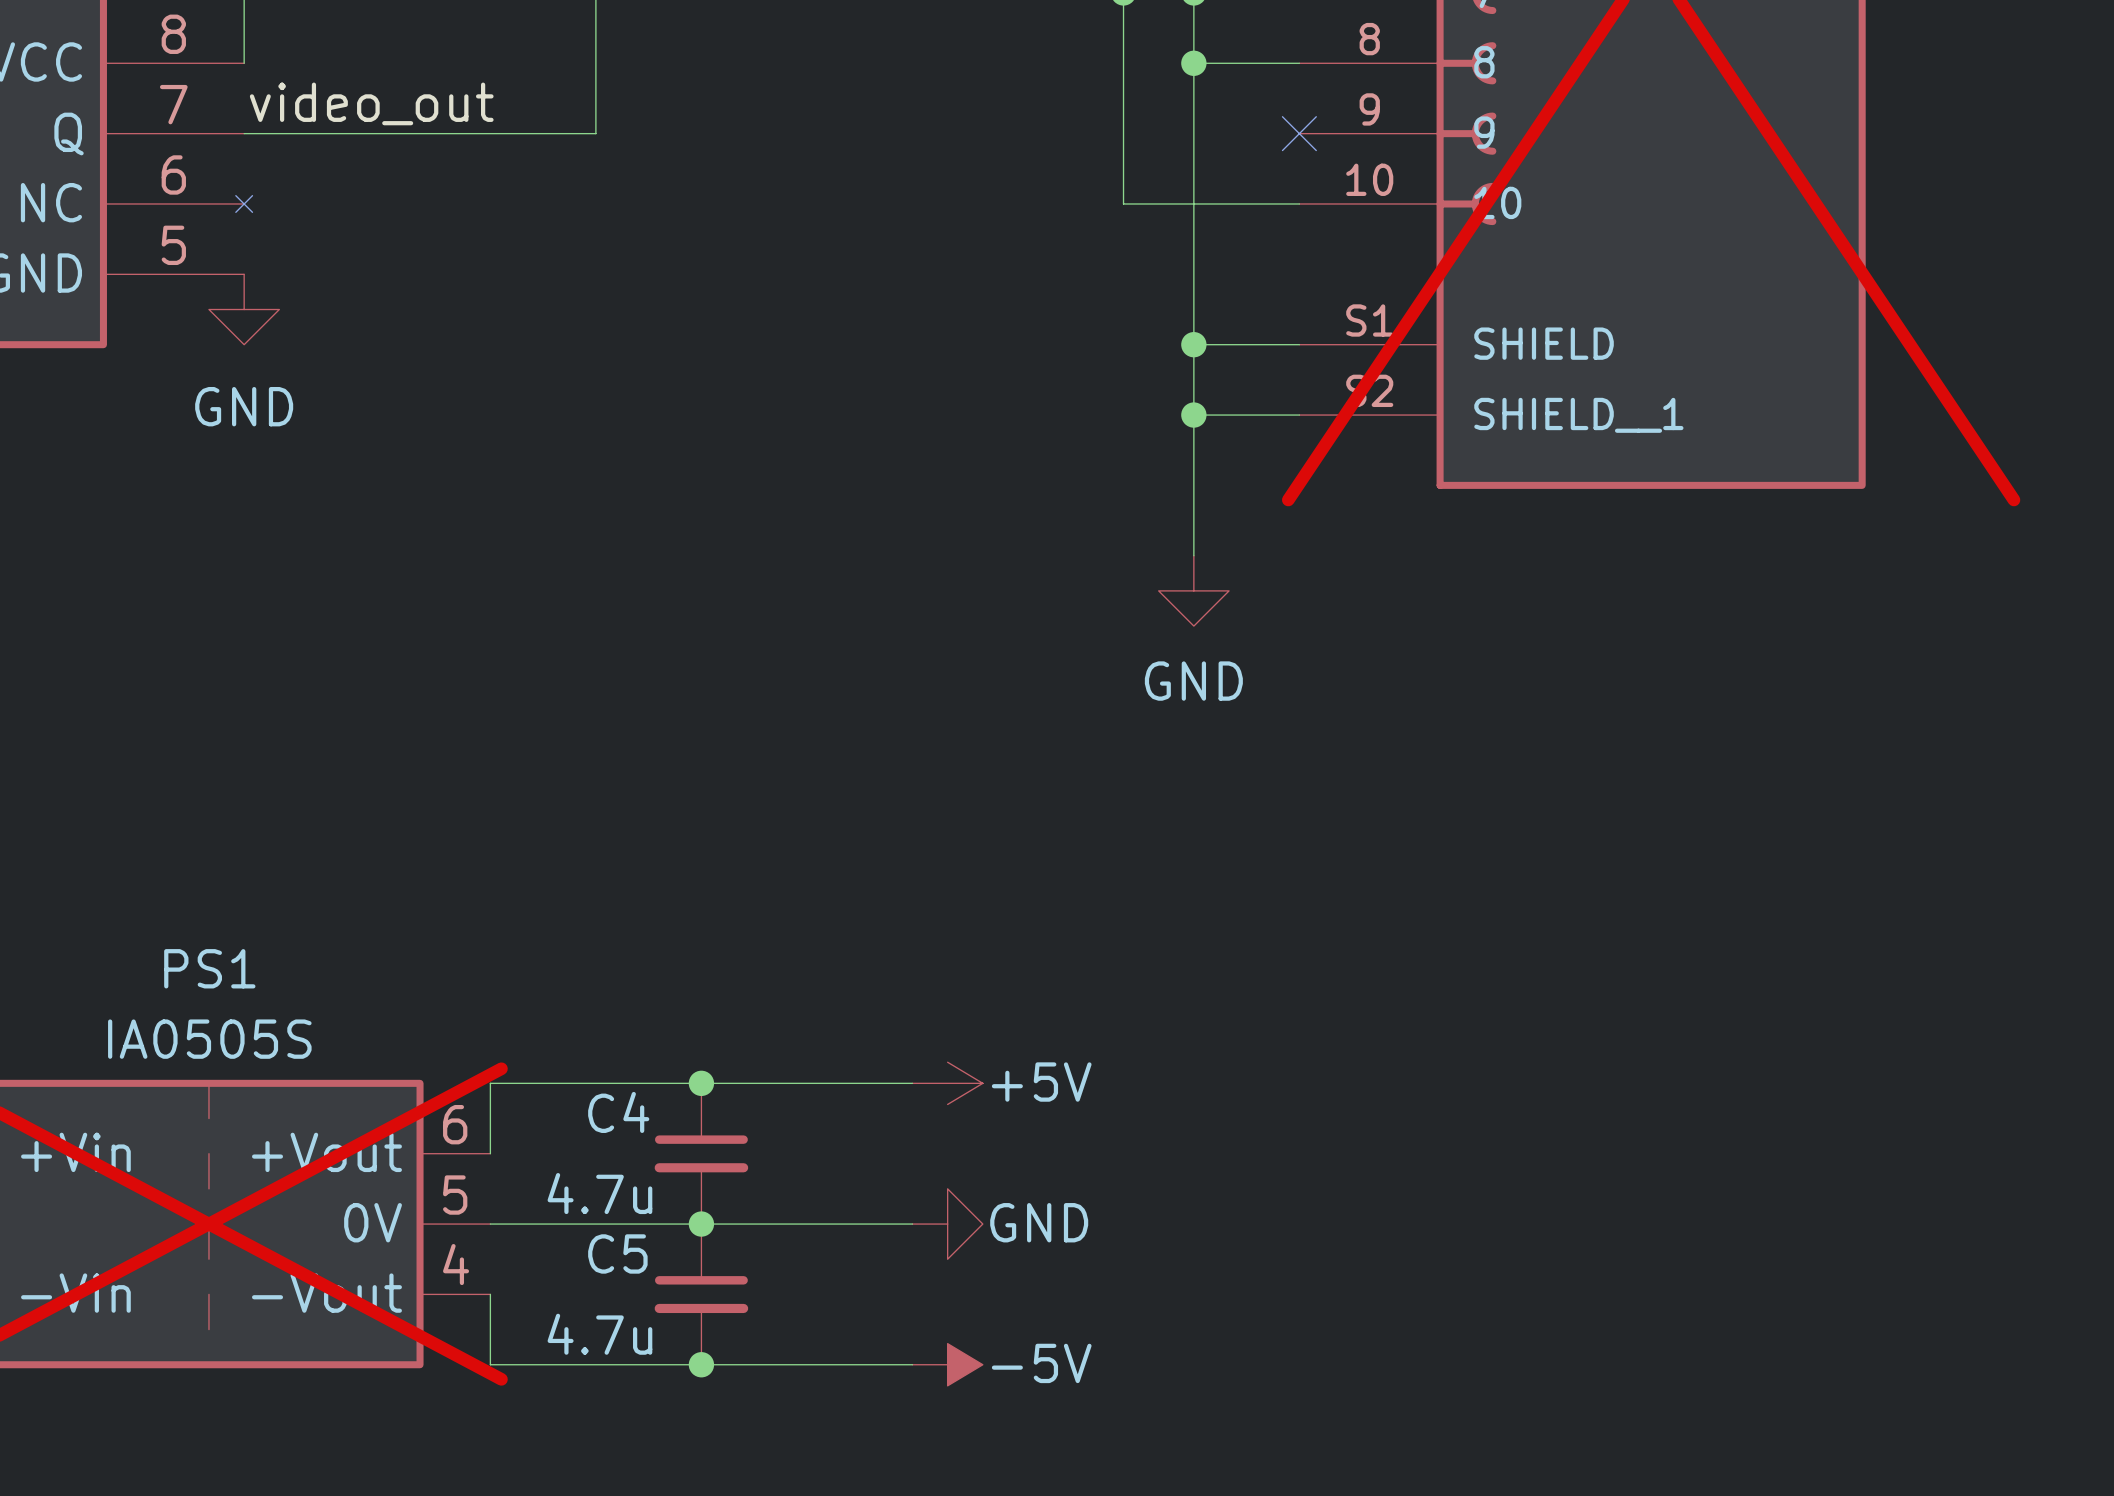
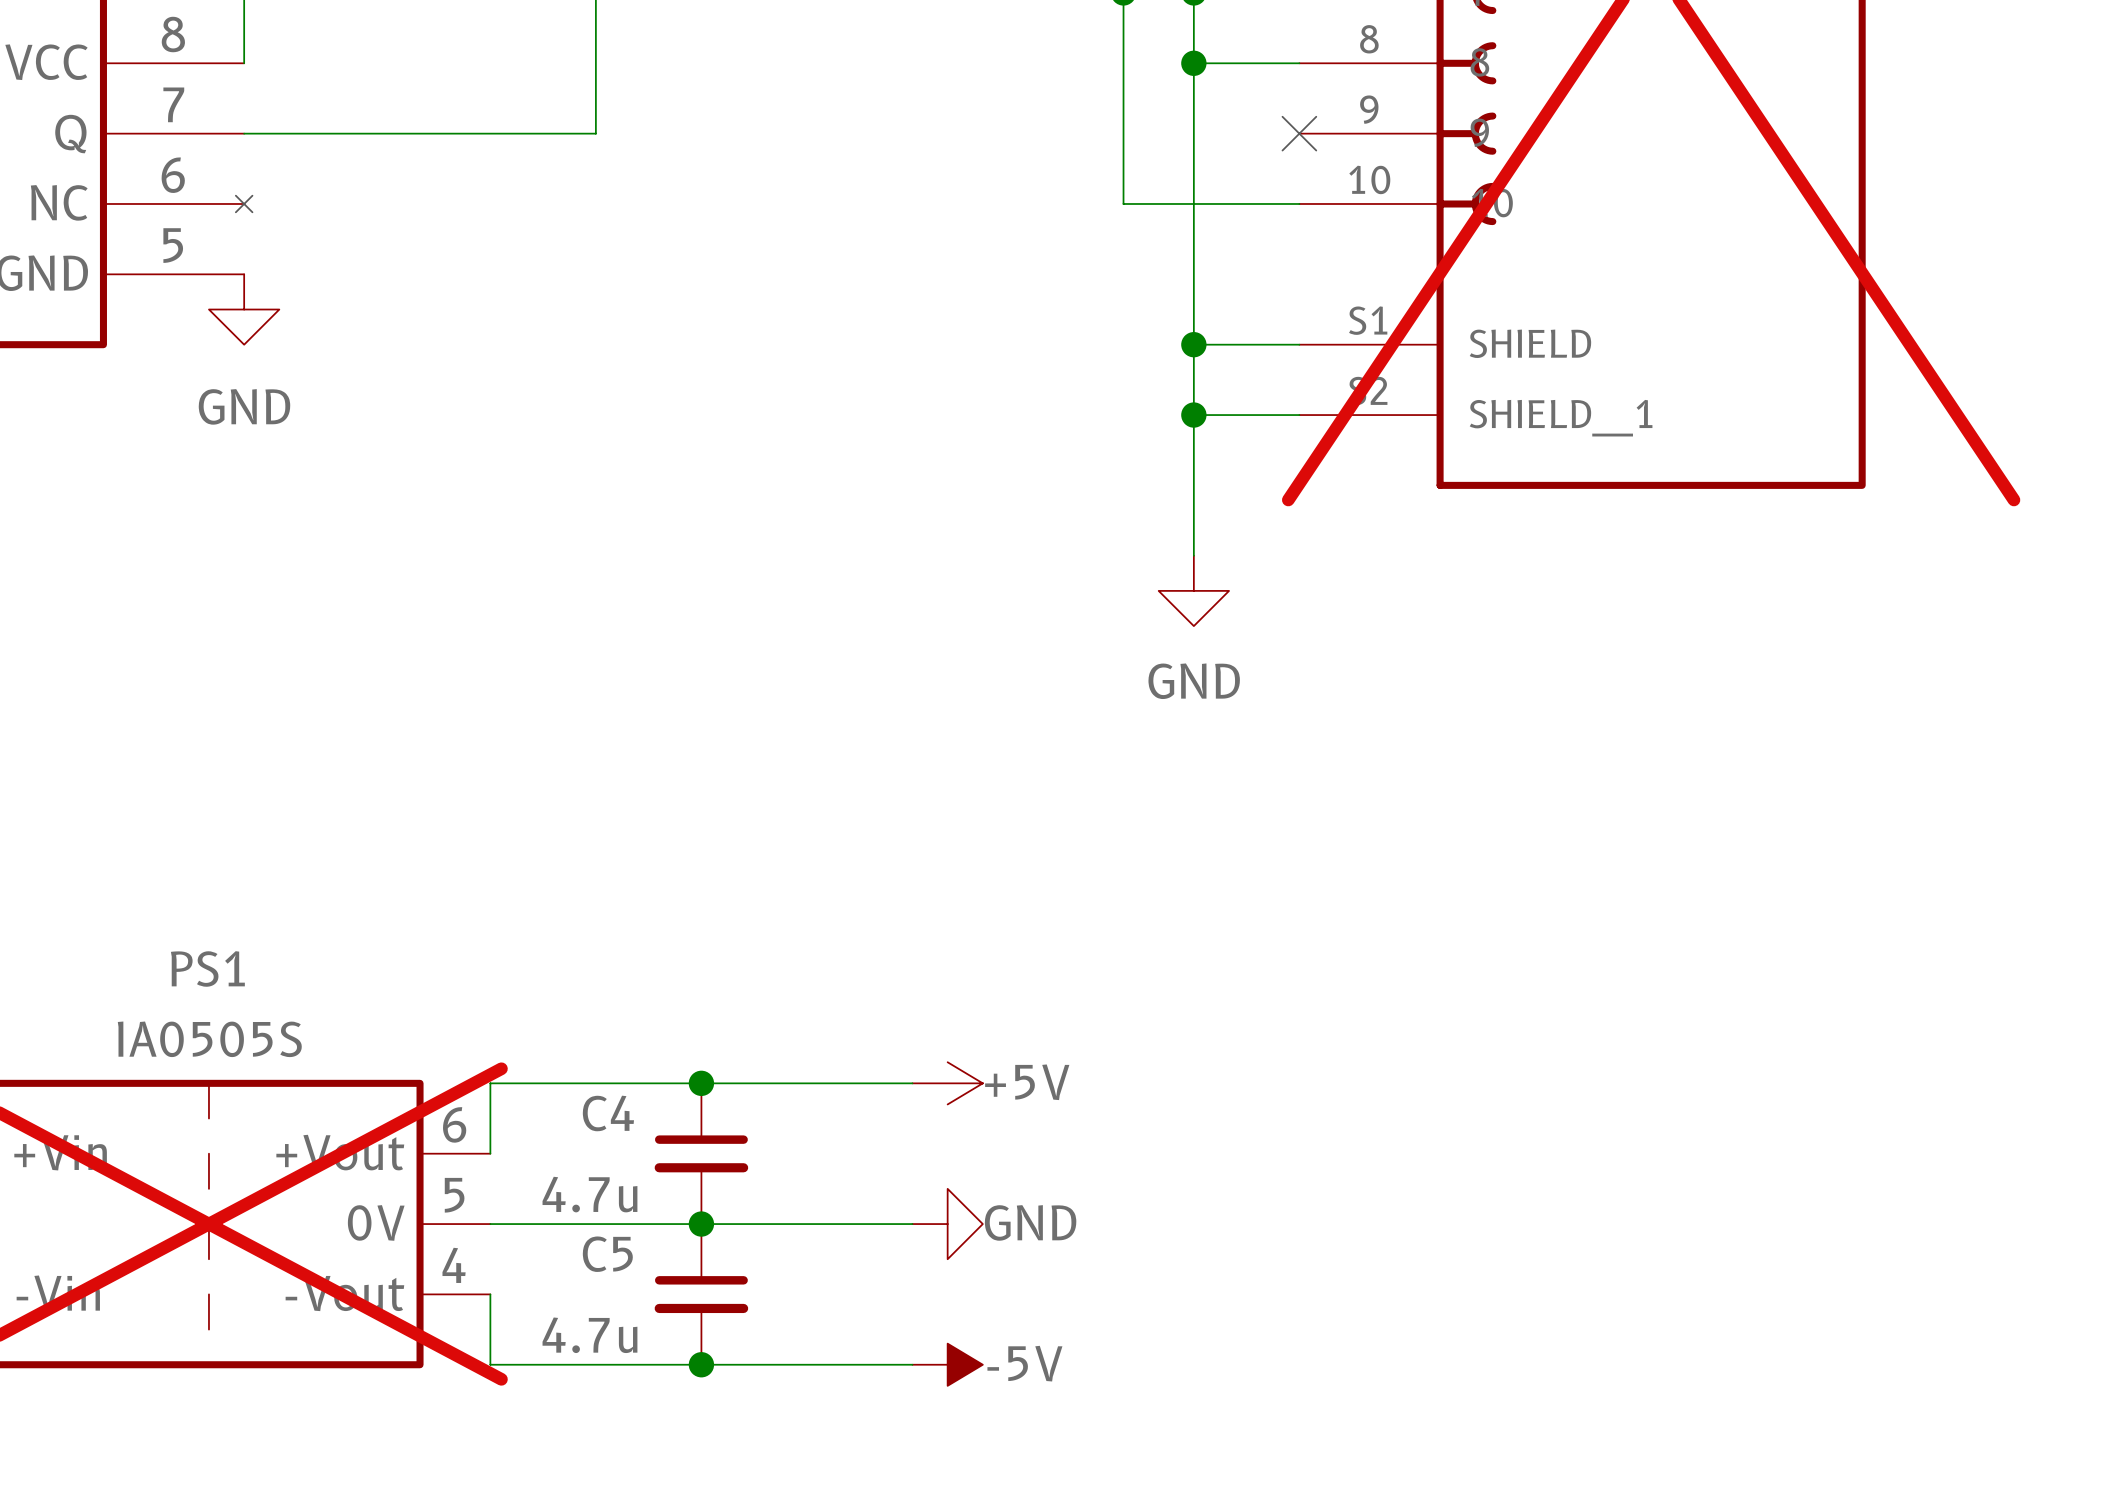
label: video_out (371, 103) -> none

